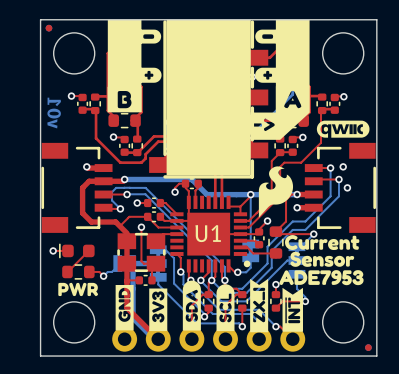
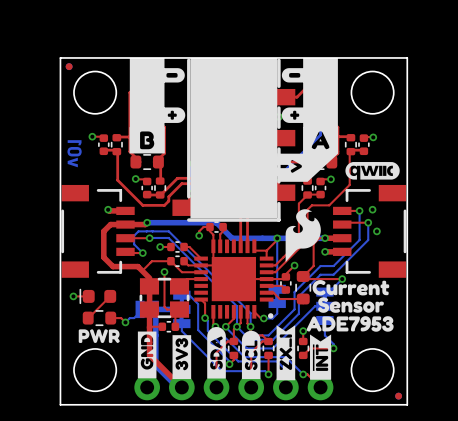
part: none -> (233, 279)
U1: (210, 234) -> none

